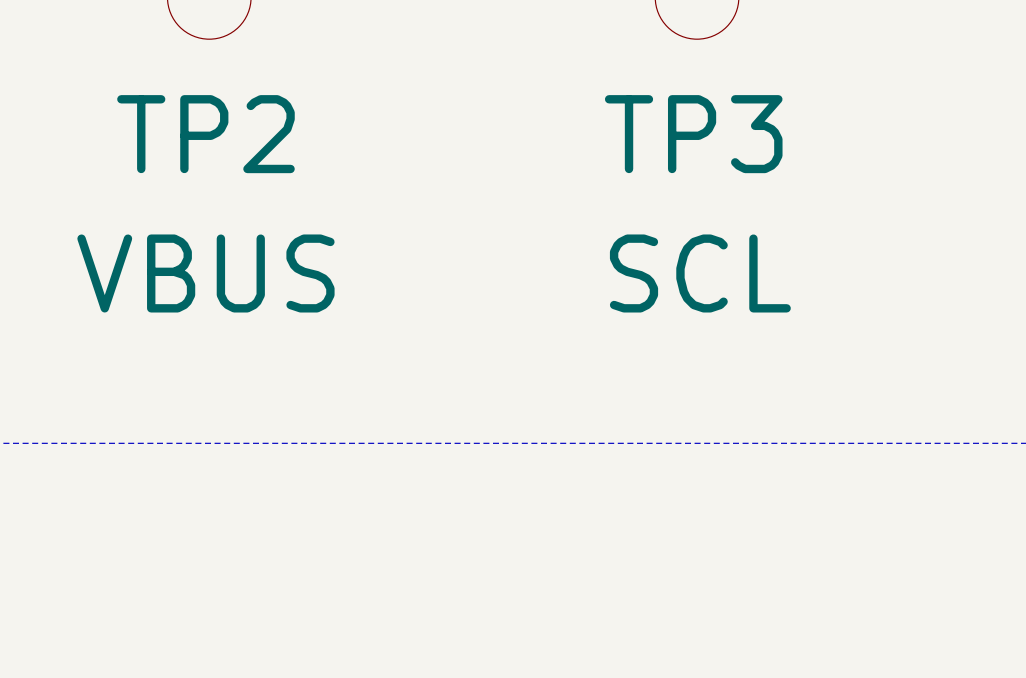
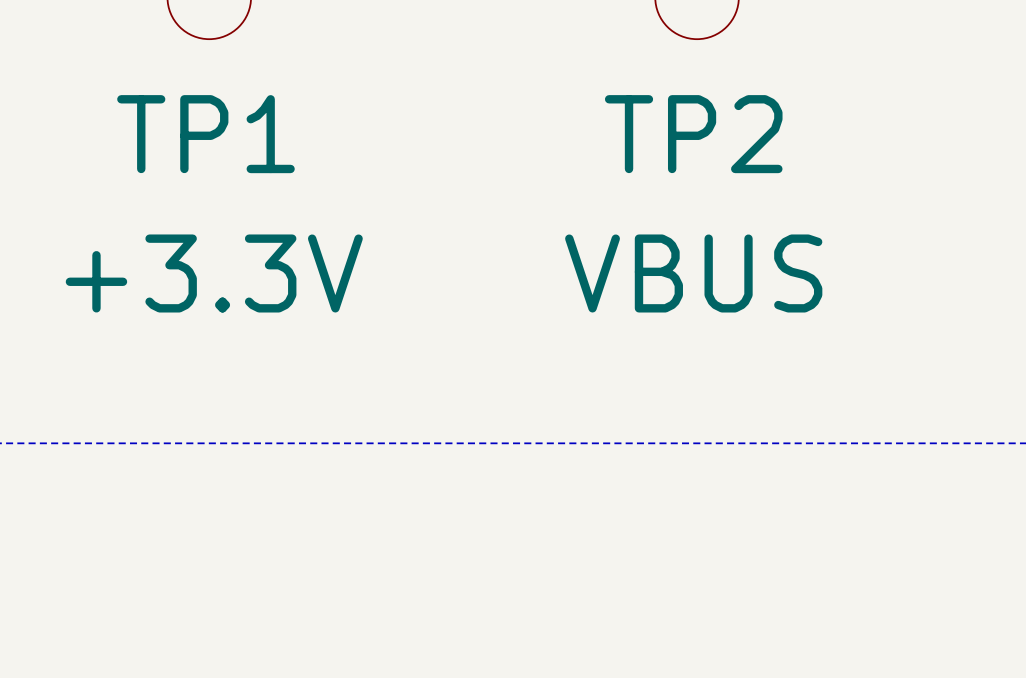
TP2 name: TP2 (205, 134) -> TP1 (205, 134)
TP3 name: TP3 (693, 134) -> TP2 (693, 134)
TP2 value: VBUS (205, 273) -> +3.3V (214, 273)
TP3 value: SCL (700, 273) -> VBUS (693, 273)

